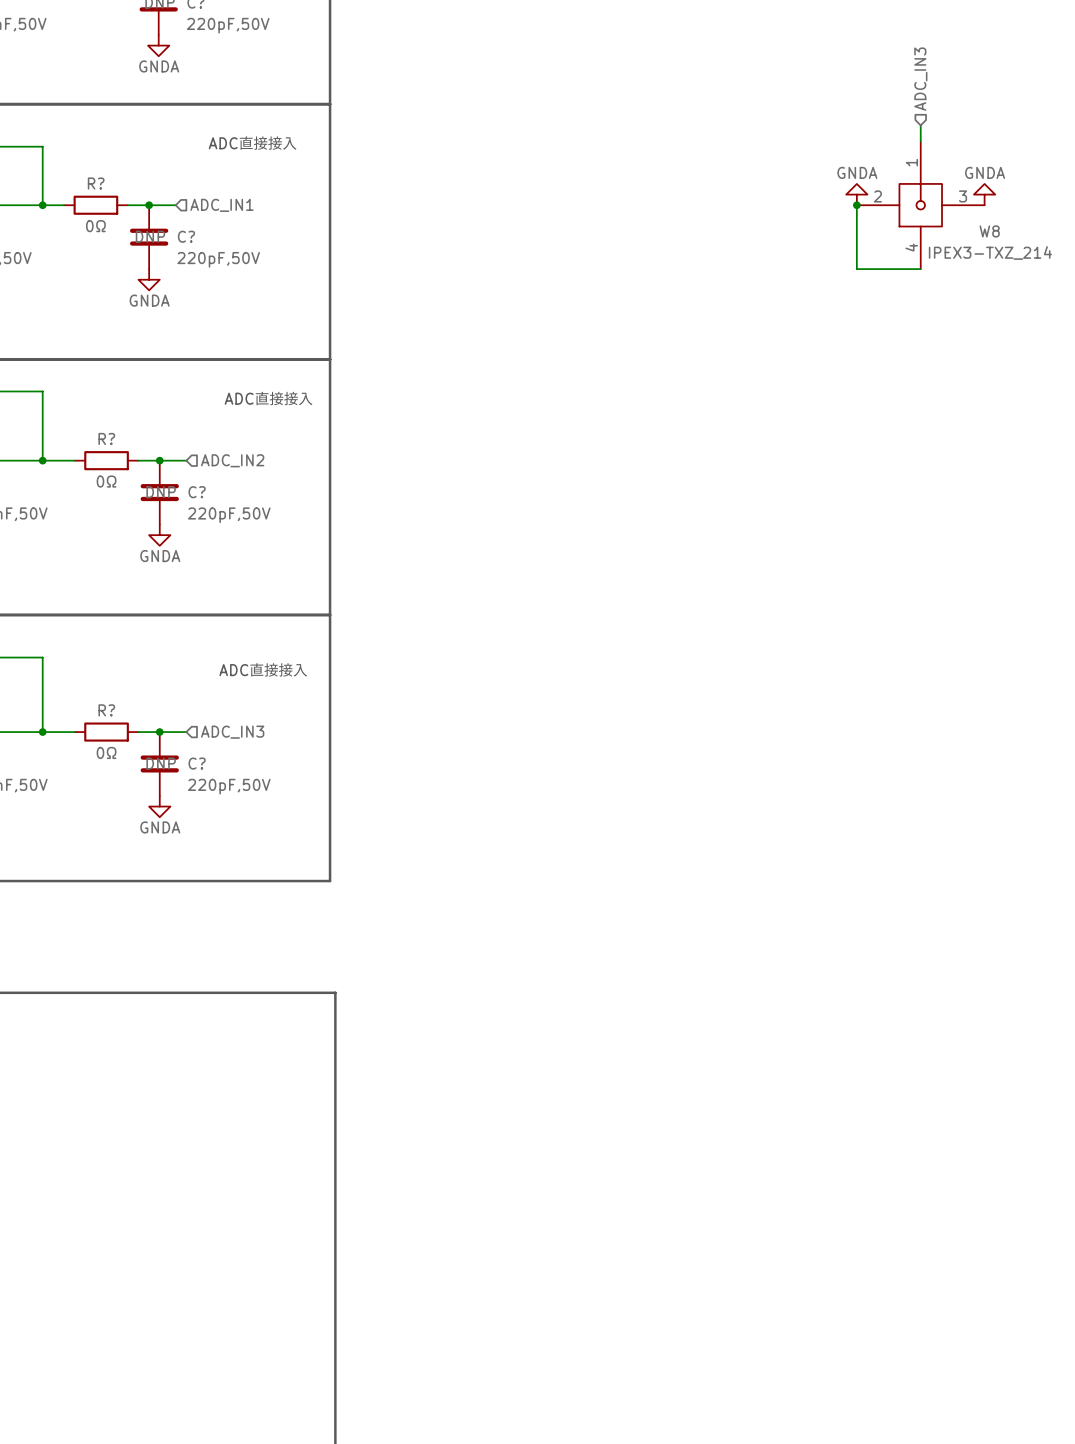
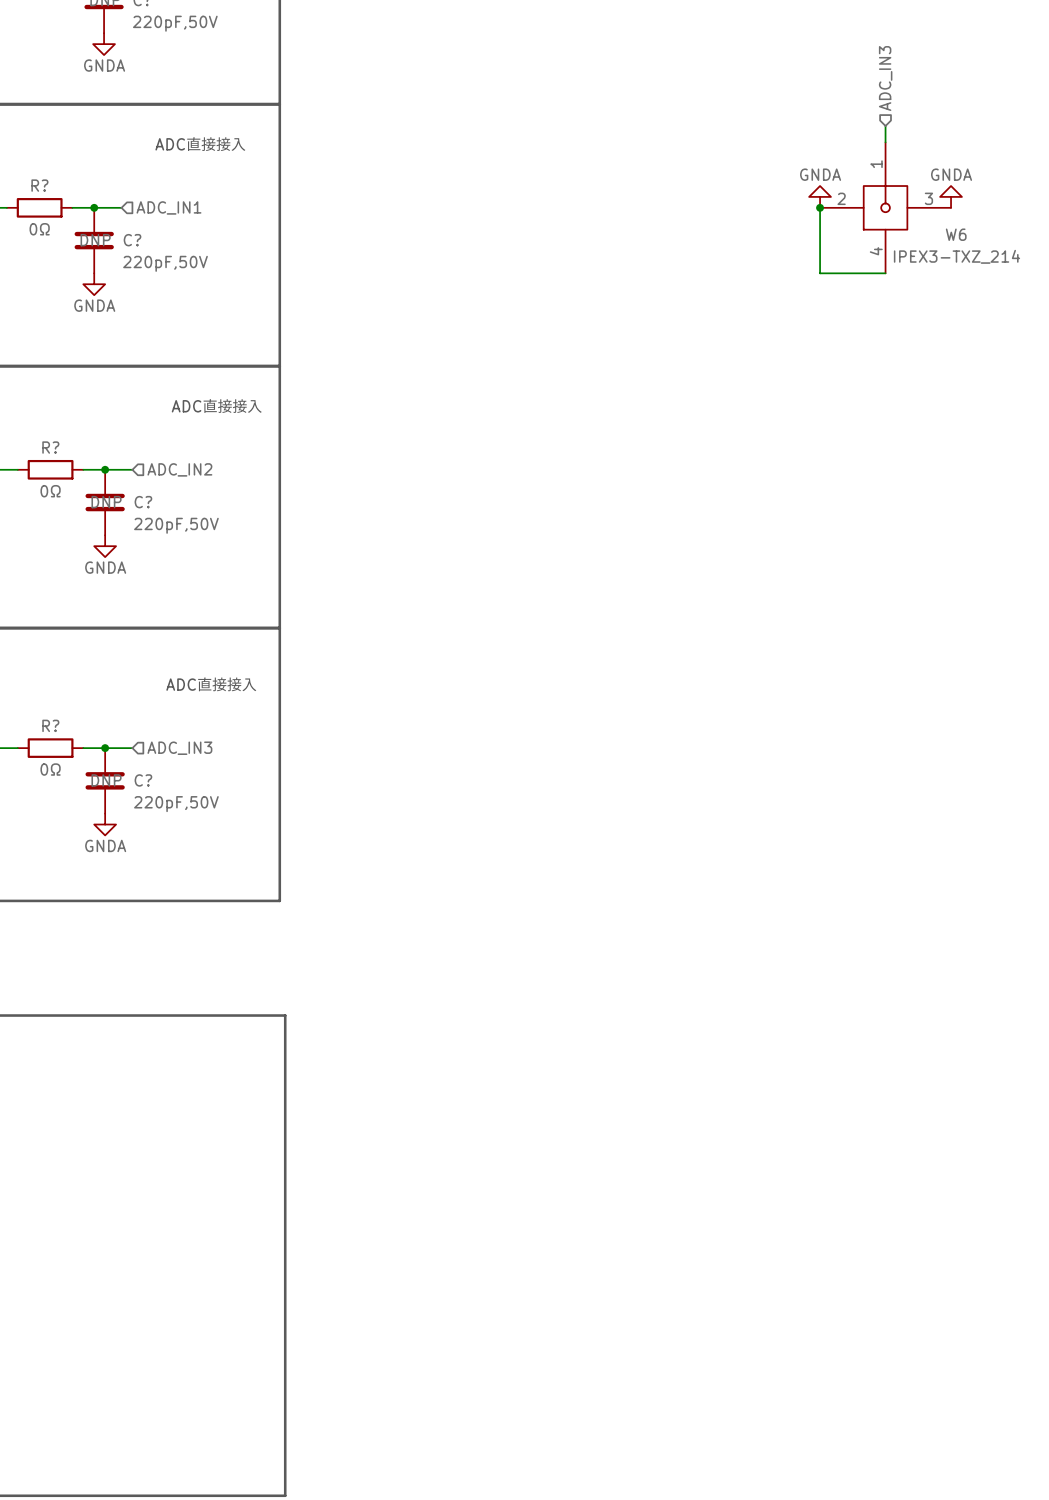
W8 name: W8 (989, 231) -> W6 (956, 234)

